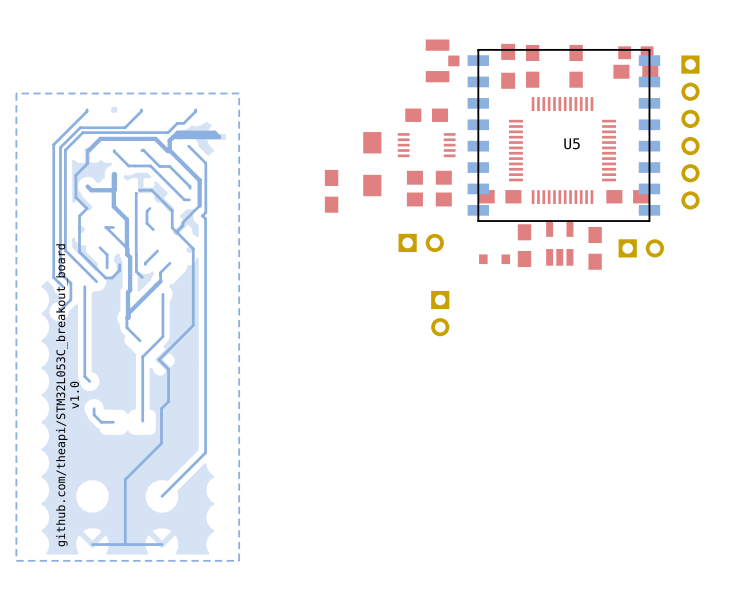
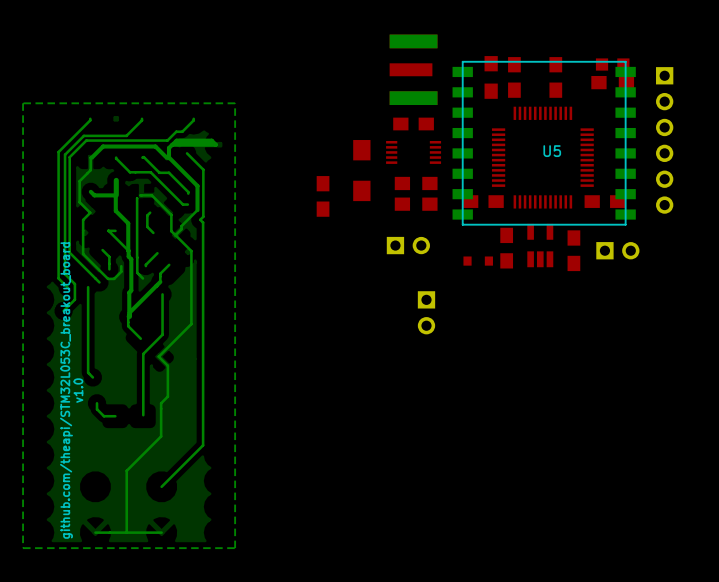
part: none -> (413, 69)
part: (442, 60) -> none

